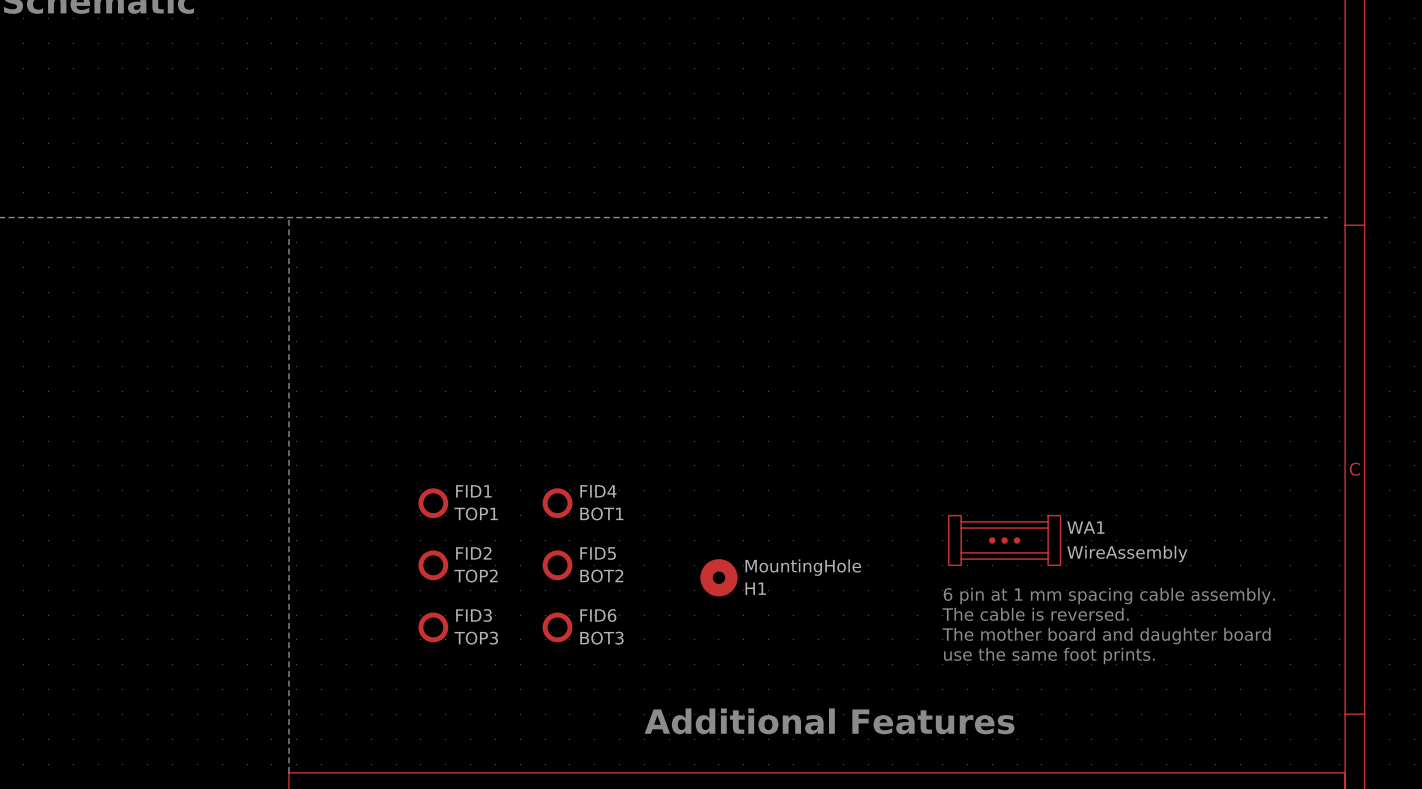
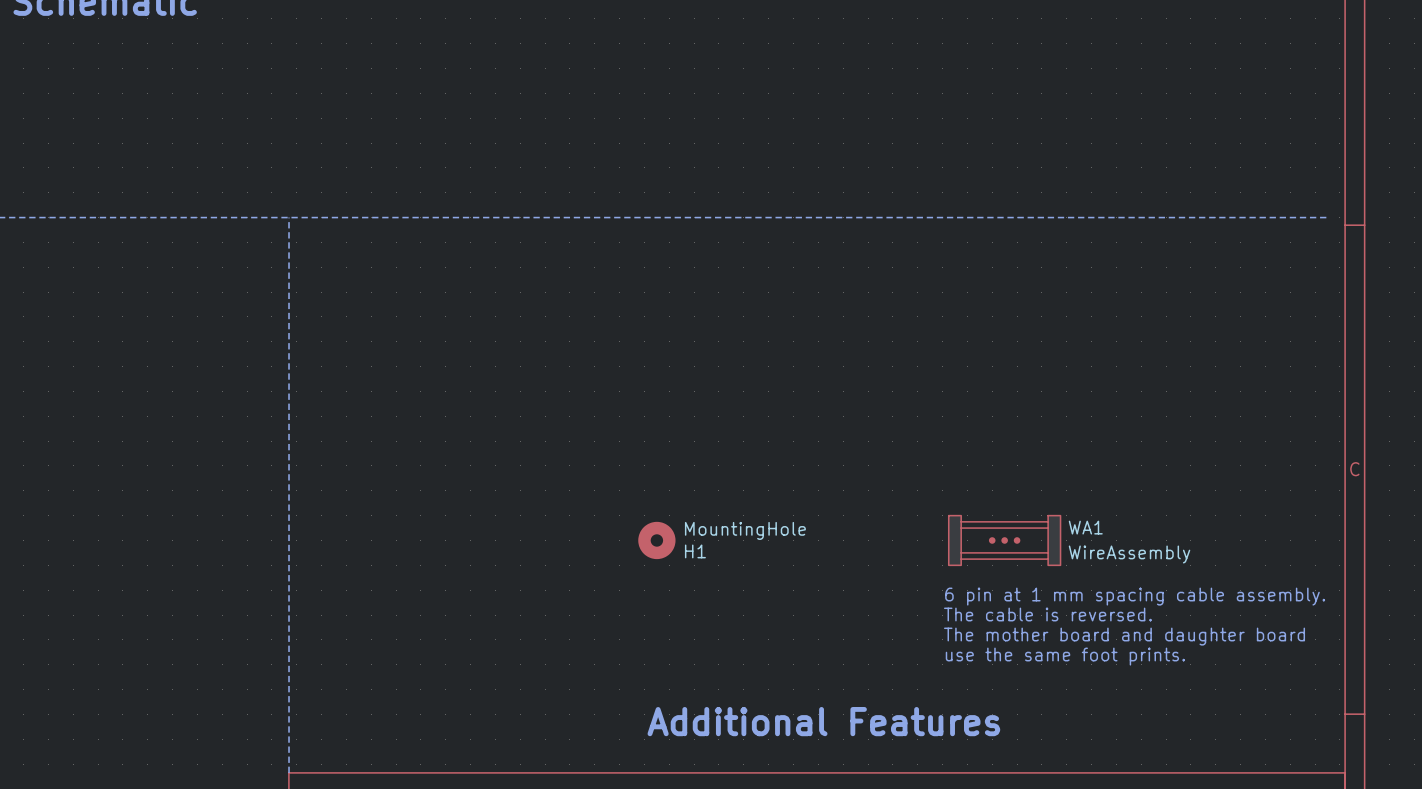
FID1: (433, 503) -> none
FID4: (557, 503) -> none
FID2: (433, 565) -> none
FID5: (557, 565) -> none
H1 position: (718, 577) -> (656, 540)
FID3: (433, 627) -> none
FID6: (557, 627) -> none

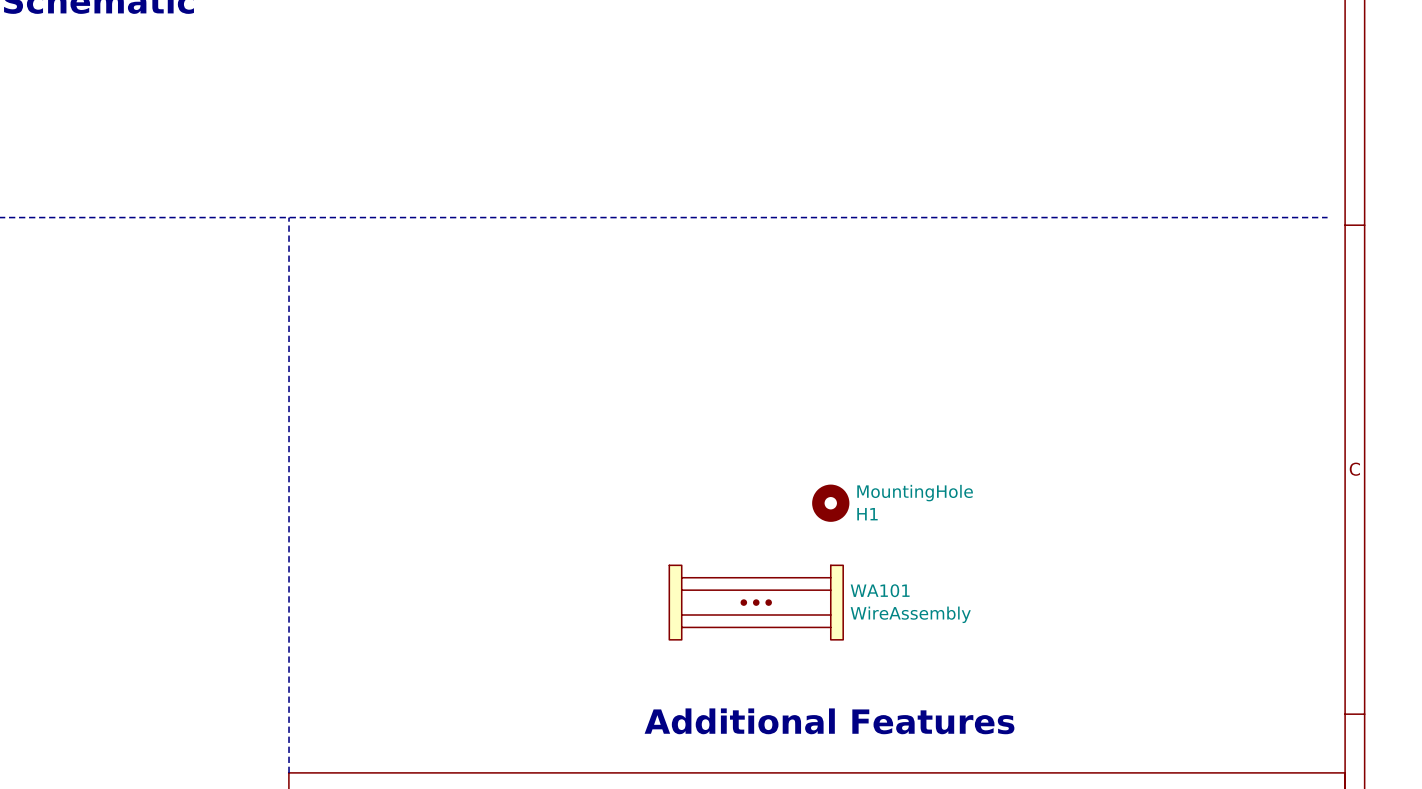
H1 position: (656, 540) -> (830, 503)
WA1: WireAssembly (1004, 540) -> none
text: 6 pin at 1 mm spacing cable assembly. (1135, 596) -> none
WA101: none -> WireAssembly (756, 602)
text: The cable is reversed. (1047, 614) -> none
text: The mother board and daughter board (1124, 636) -> none
text: use the same foot prints. (1065, 656) -> none

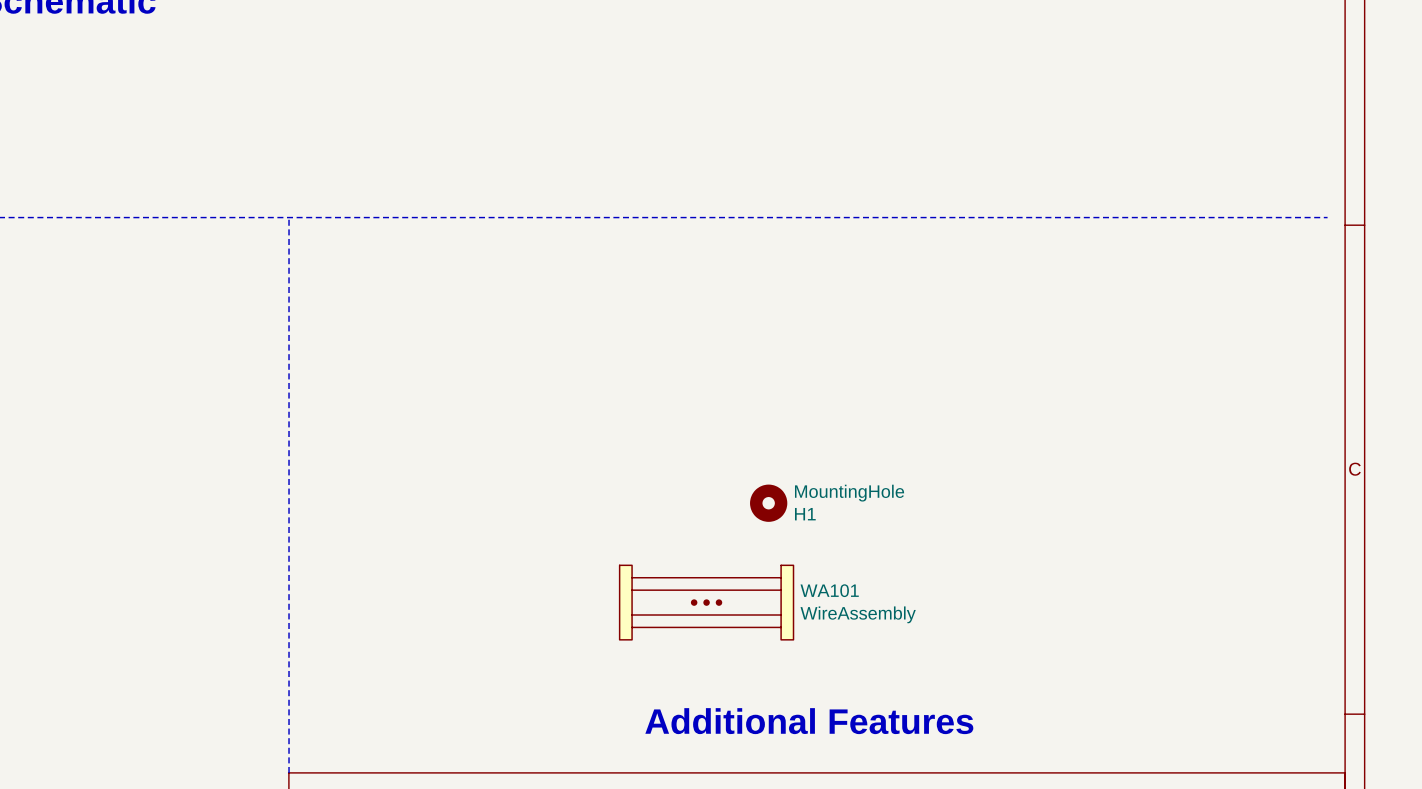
H1 position: (830, 503) -> (768, 503)
WA101 position: (756, 602) -> (706, 602)

